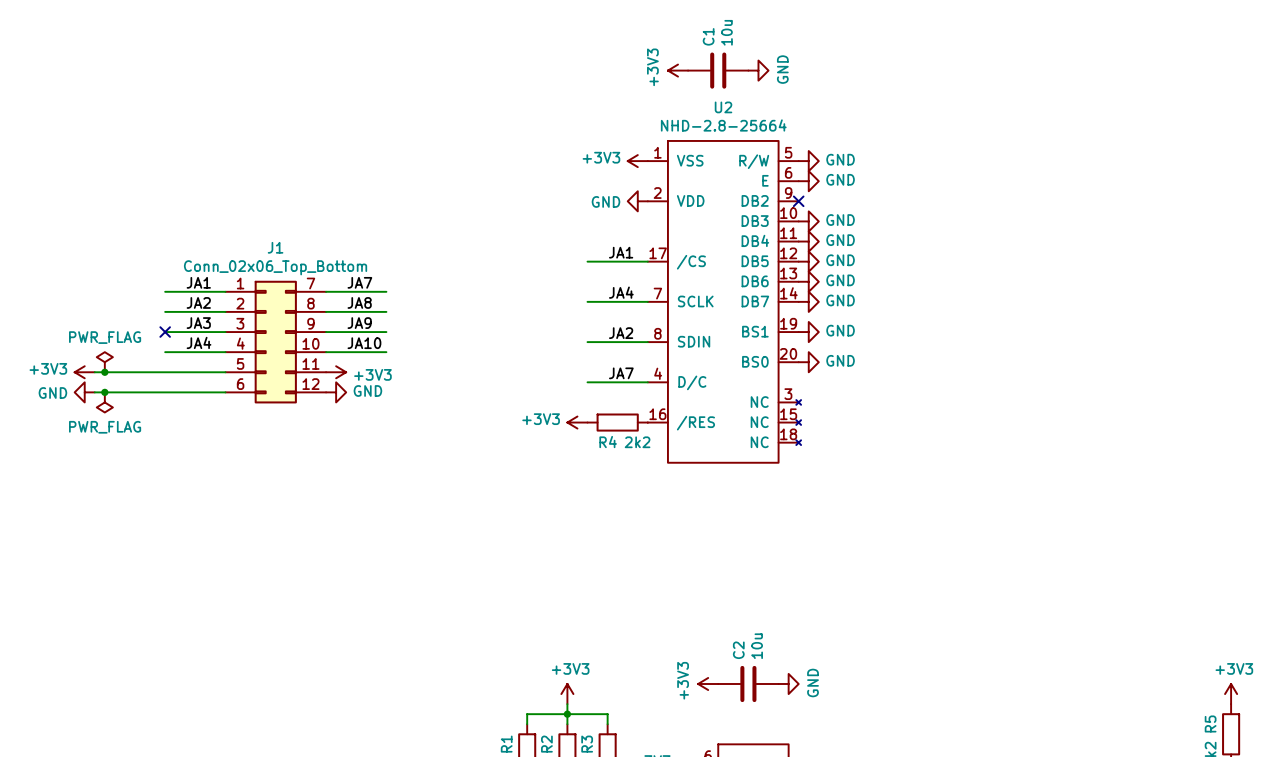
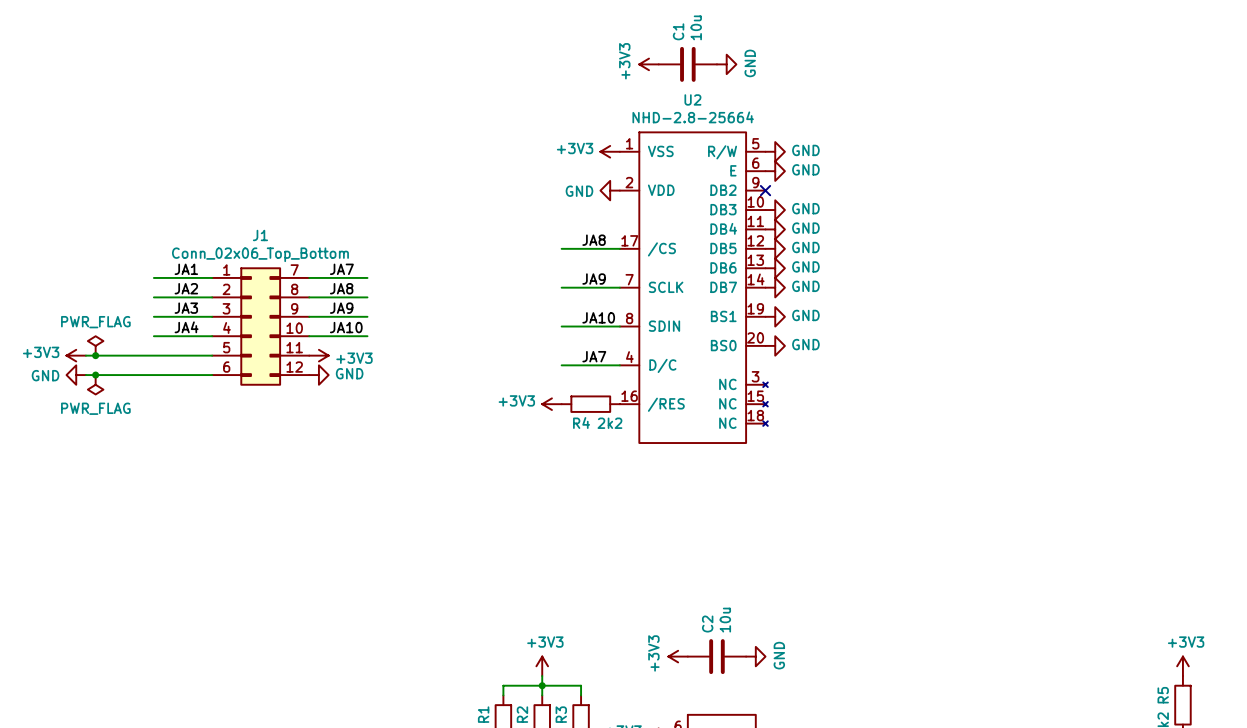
label: JA1 (621, 252) -> JA8 (594, 240)
label: JA4 (621, 292) -> JA9 (594, 279)
no-connect mark: (165, 332) -> none
label: JA2 (621, 333) -> JA10 (598, 317)

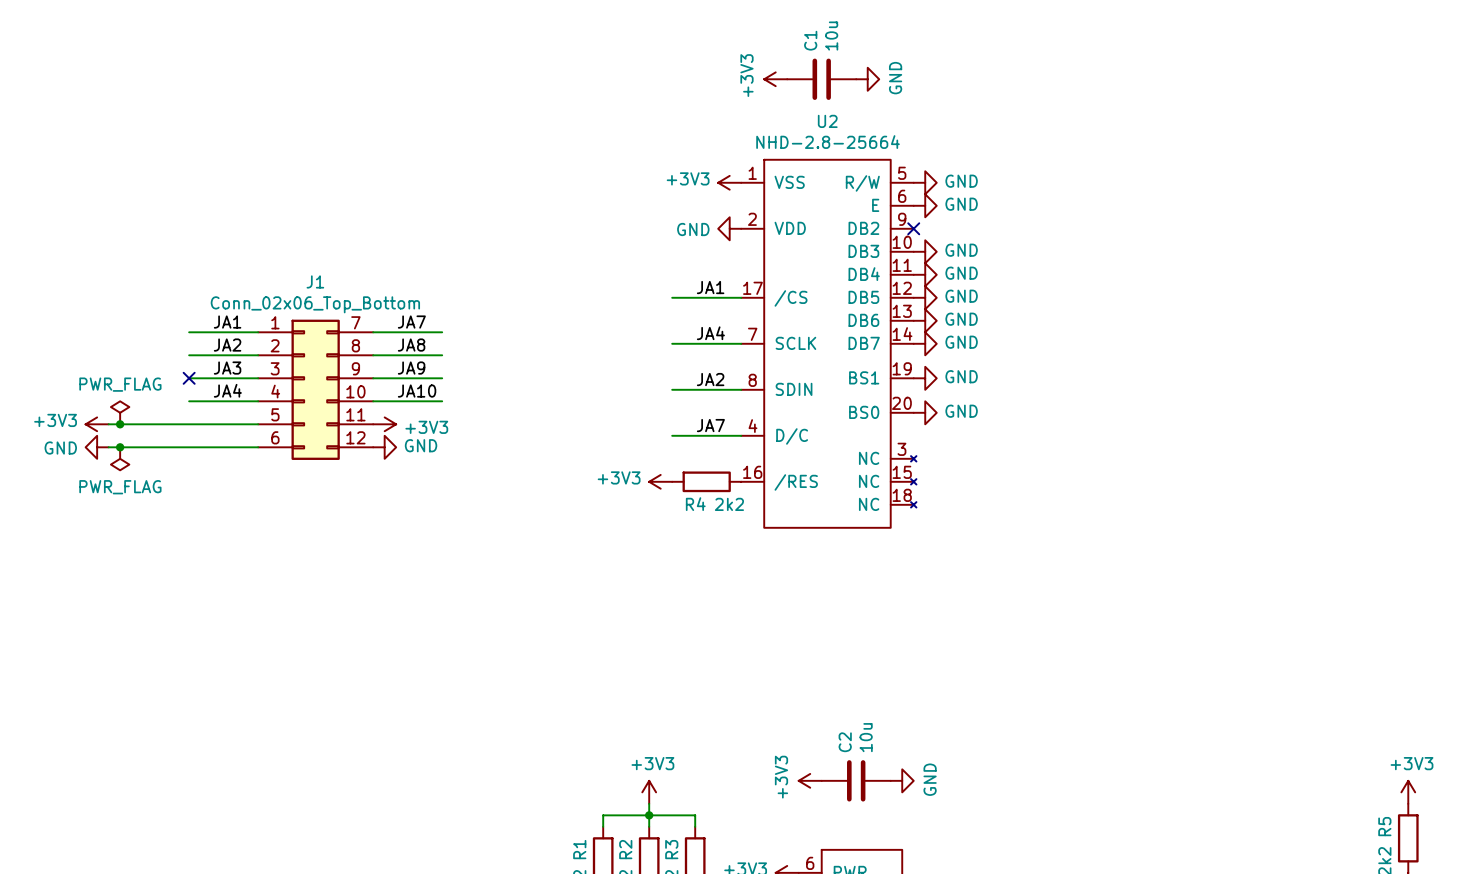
label: JA8 (594, 240) -> JA1 (710, 287)
label: JA9 (594, 279) -> JA4 (710, 333)
no-connect mark: none -> (189, 378)
label: JA10 (598, 317) -> JA2 (710, 379)

